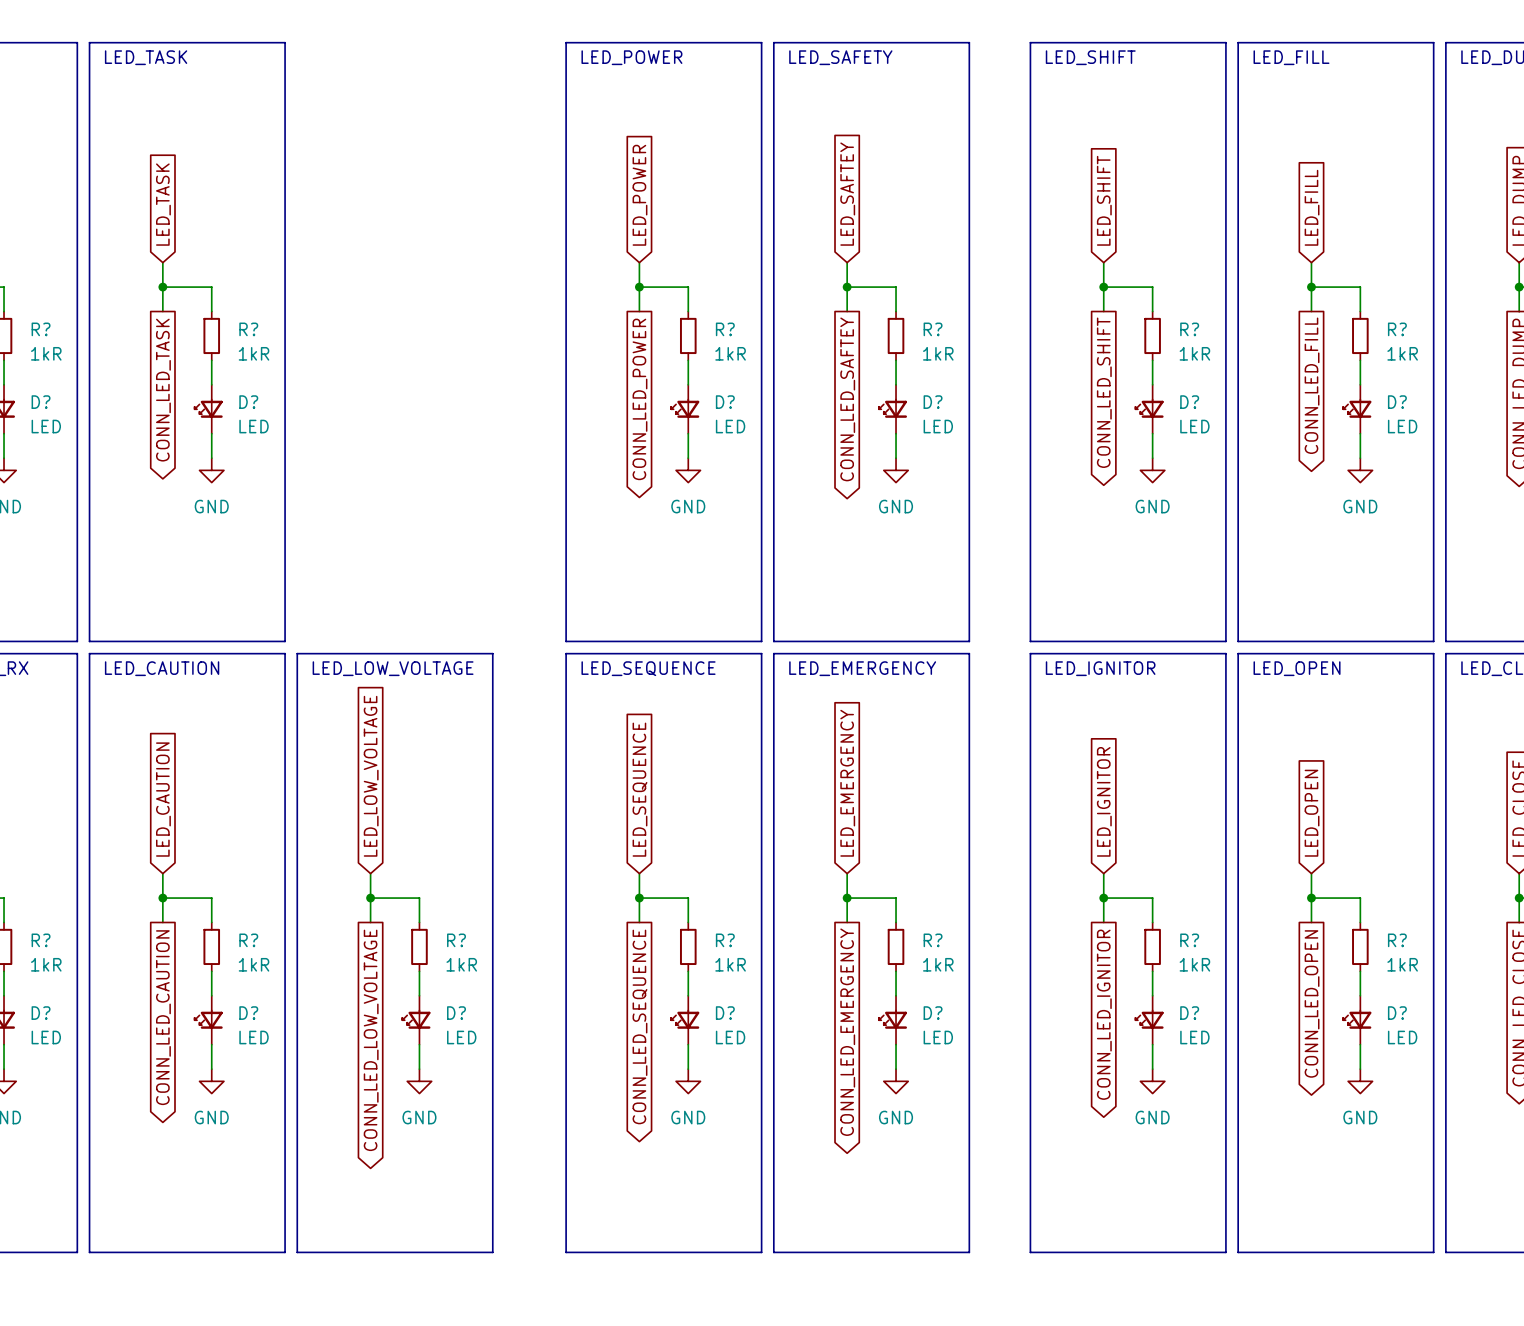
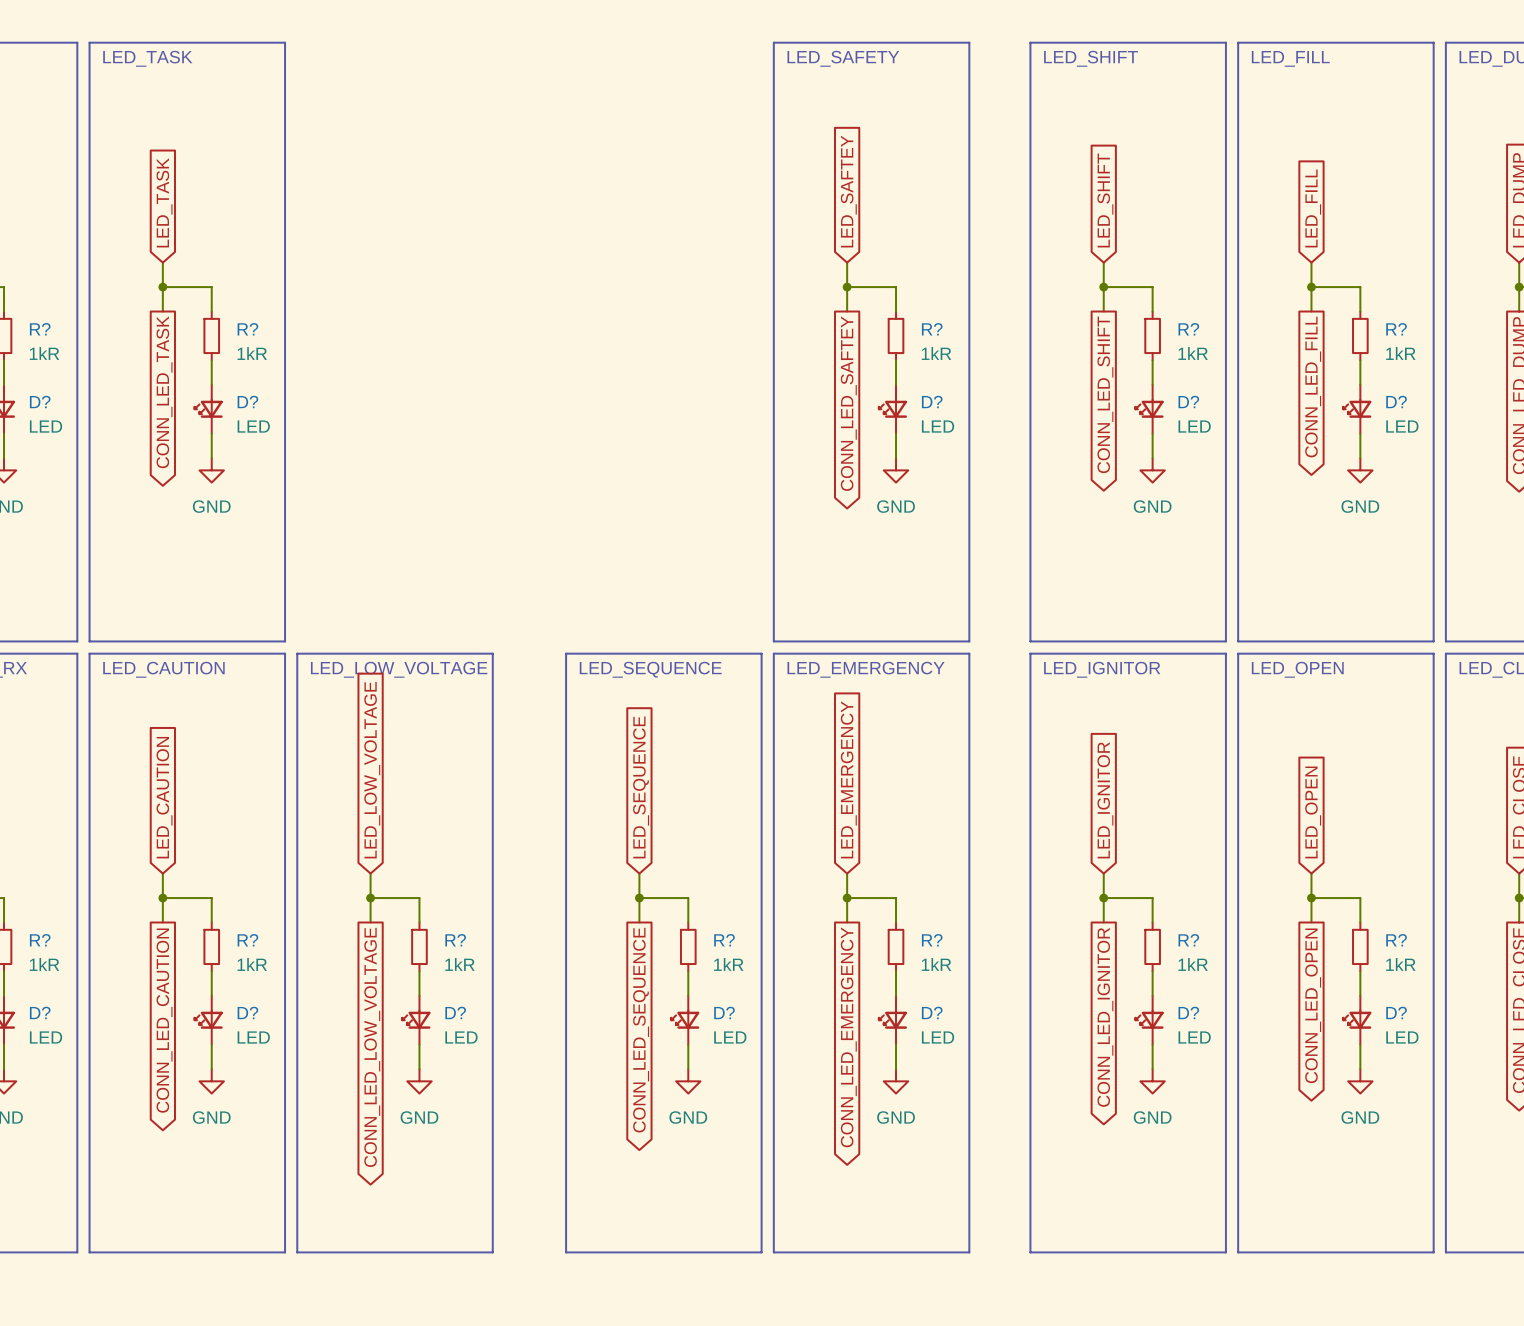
line: (566, 42) (761, 42) (761, 641) (566, 641) (566, 42) -> none
text: LED_POWER (631, 57) -> none
global label: LED_POWER (639, 195) -> none
wire: (639, 262) (639, 311) -> none
wire: (639, 287) (688, 287) (688, 311) -> none
junction: (639, 287) -> none
R?: 1kR (688, 335) -> none
wire: (688, 360) (688, 384) -> none
global label: CONN_LED_POWER (639, 399) -> none
D?: LED (685, 409) -> none
wire: (688, 433) (688, 458) -> none
power symbol: GND (688, 470) -> none

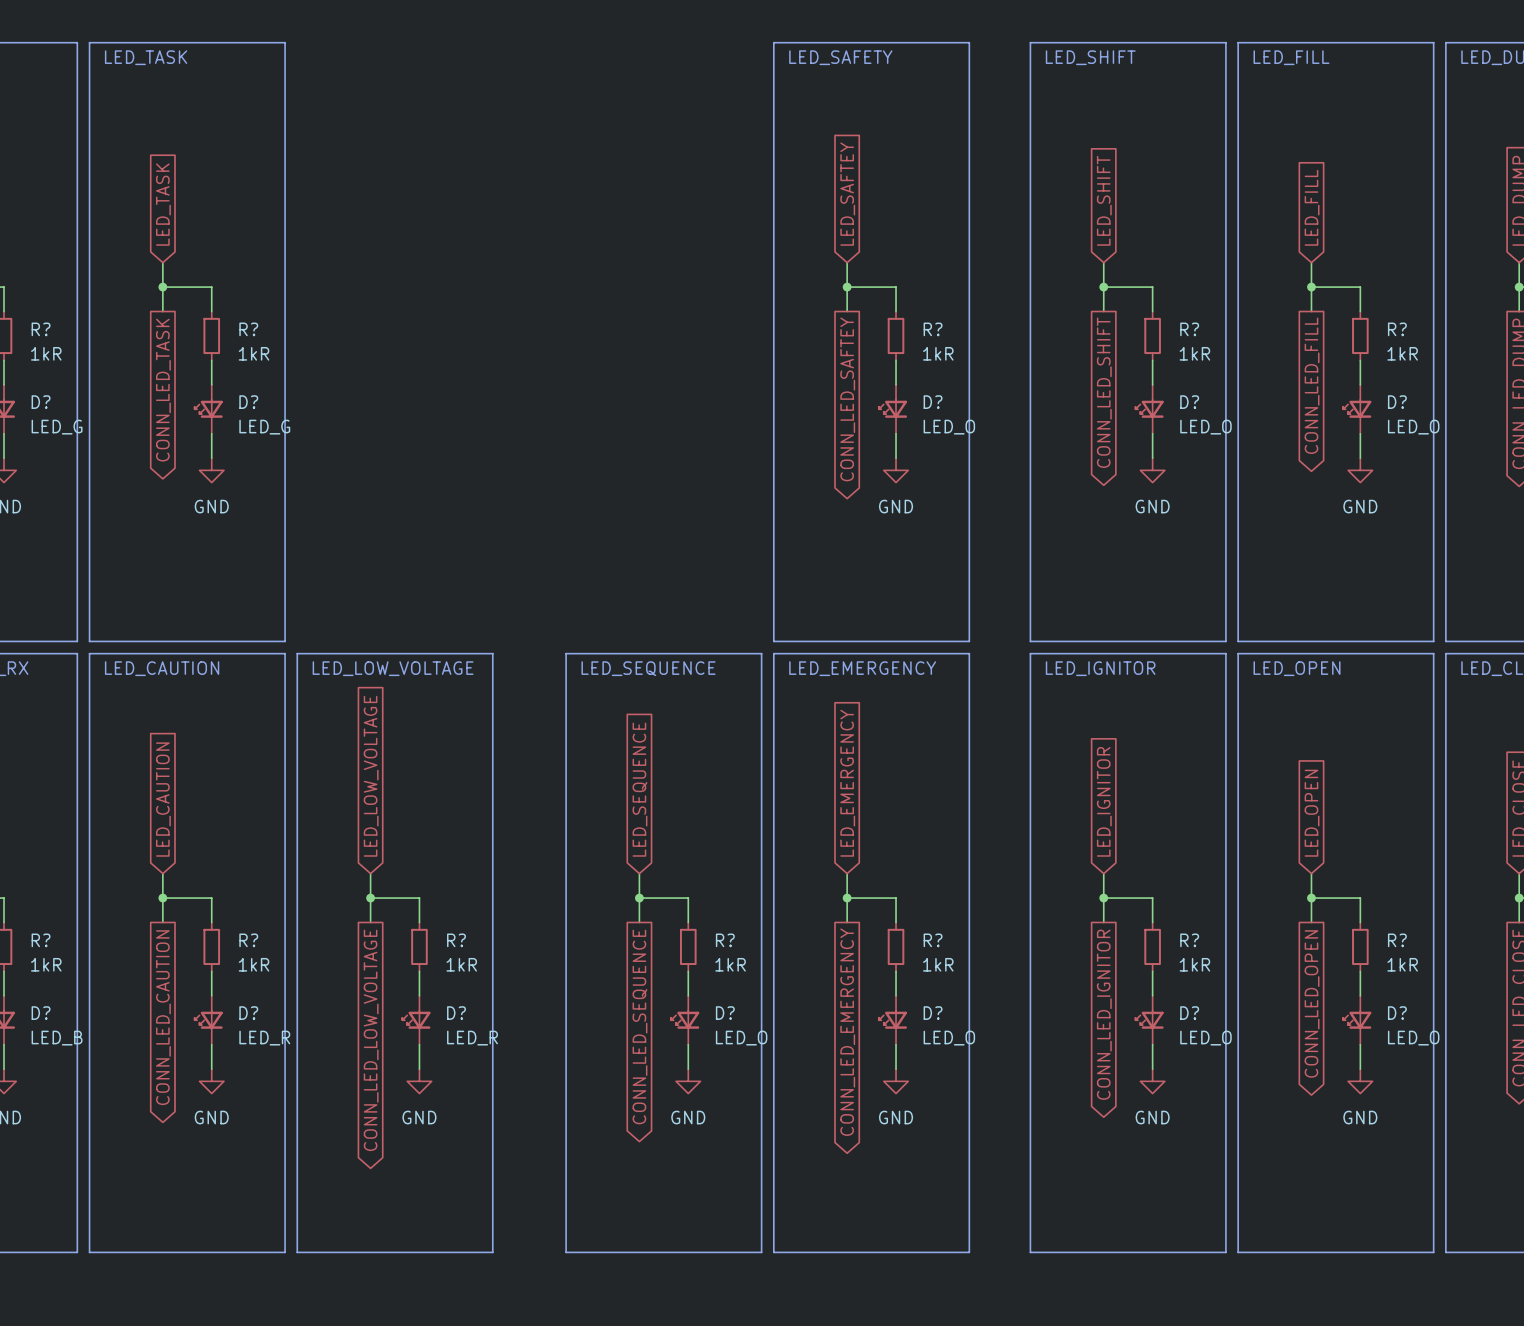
D? value: LED (46, 426) -> LED_G (57, 427)
D? value: LED (253, 426) -> LED_G (264, 427)
D? value: LED (938, 426) -> LED_O (949, 427)
D? value: LED (1194, 426) -> LED_O (1205, 427)
D? value: LED (1402, 426) -> LED_O (1413, 427)
D? value: LED (46, 1037) -> LED_B (57, 1038)
D? value: LED (253, 1037) -> LED_R (264, 1038)
D? value: LED (461, 1037) -> LED_R (472, 1038)
D? value: LED (730, 1037) -> LED_O (741, 1038)
D? value: LED (938, 1037) -> LED_O (949, 1038)
D? value: LED (1194, 1037) -> LED_O (1205, 1038)
D? value: LED (1402, 1037) -> LED_O (1413, 1038)

